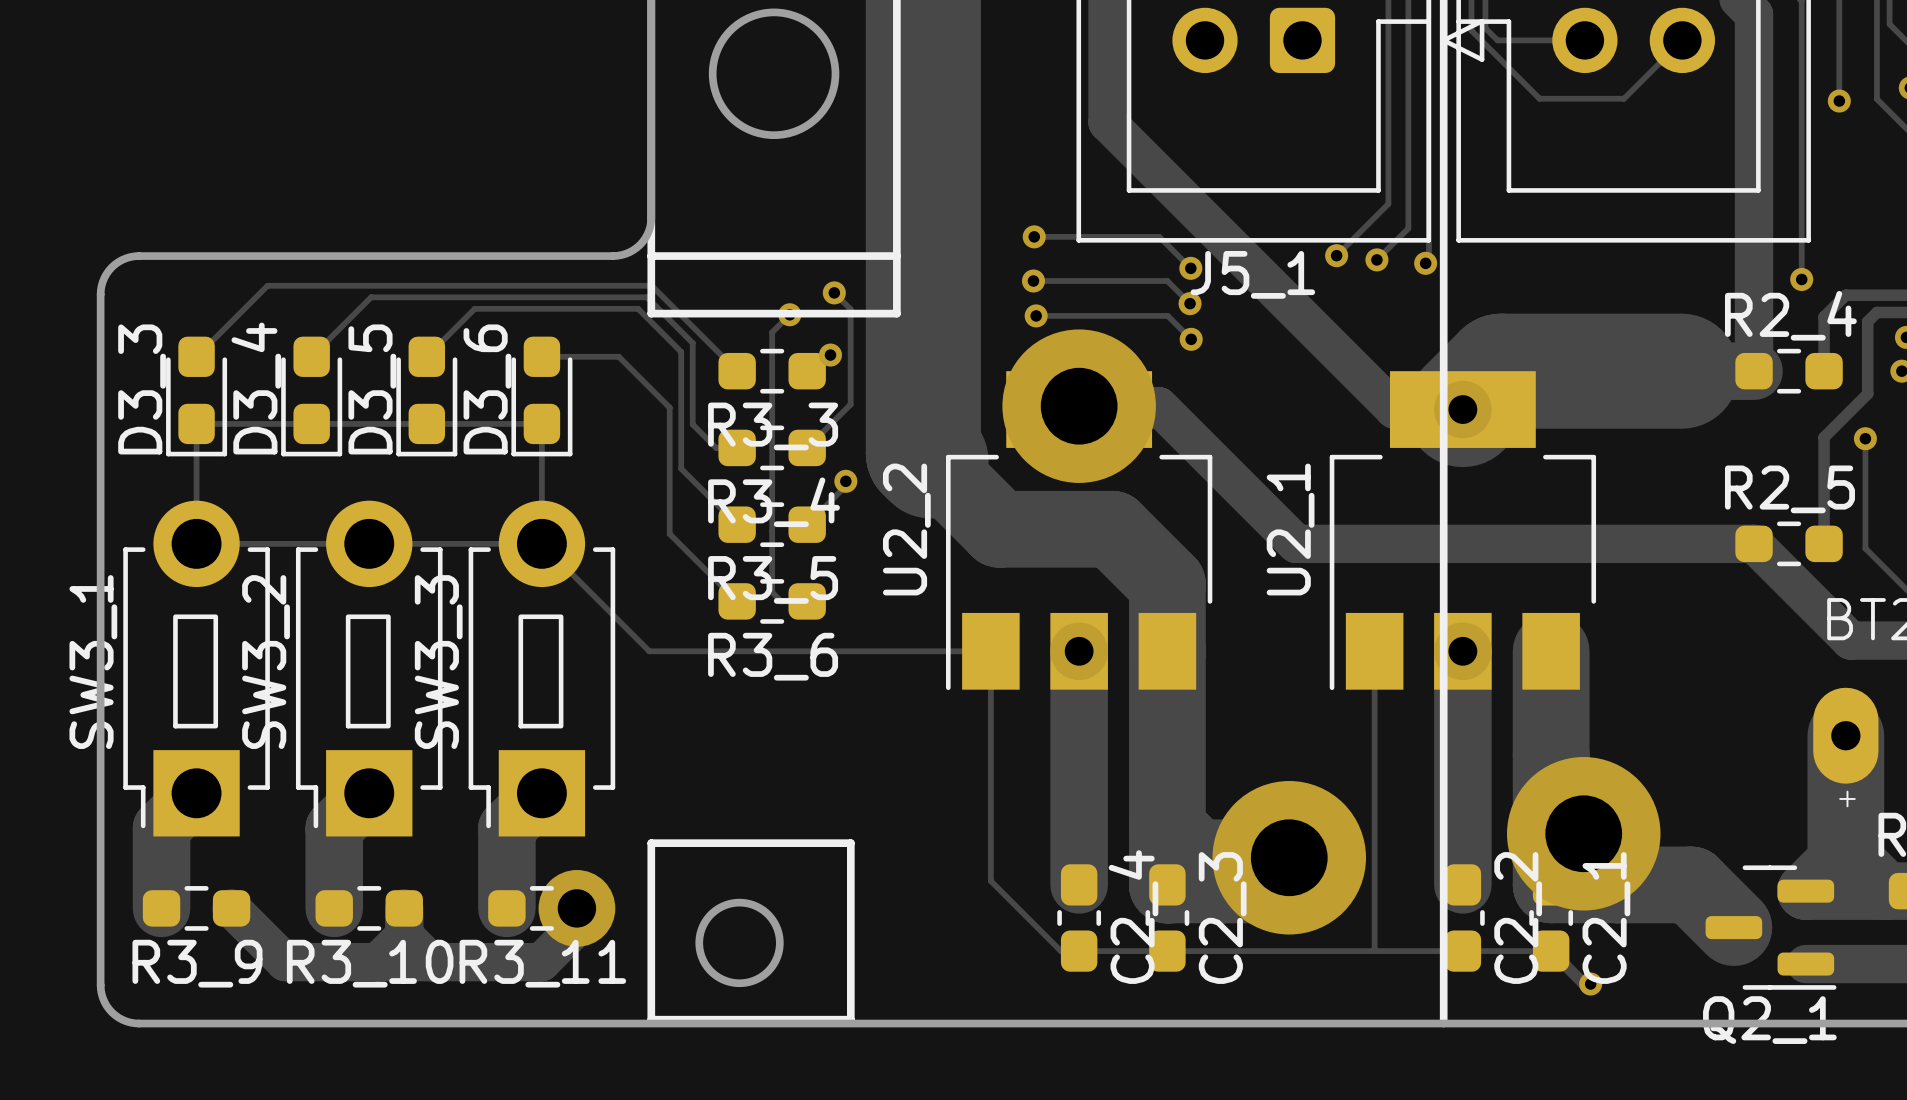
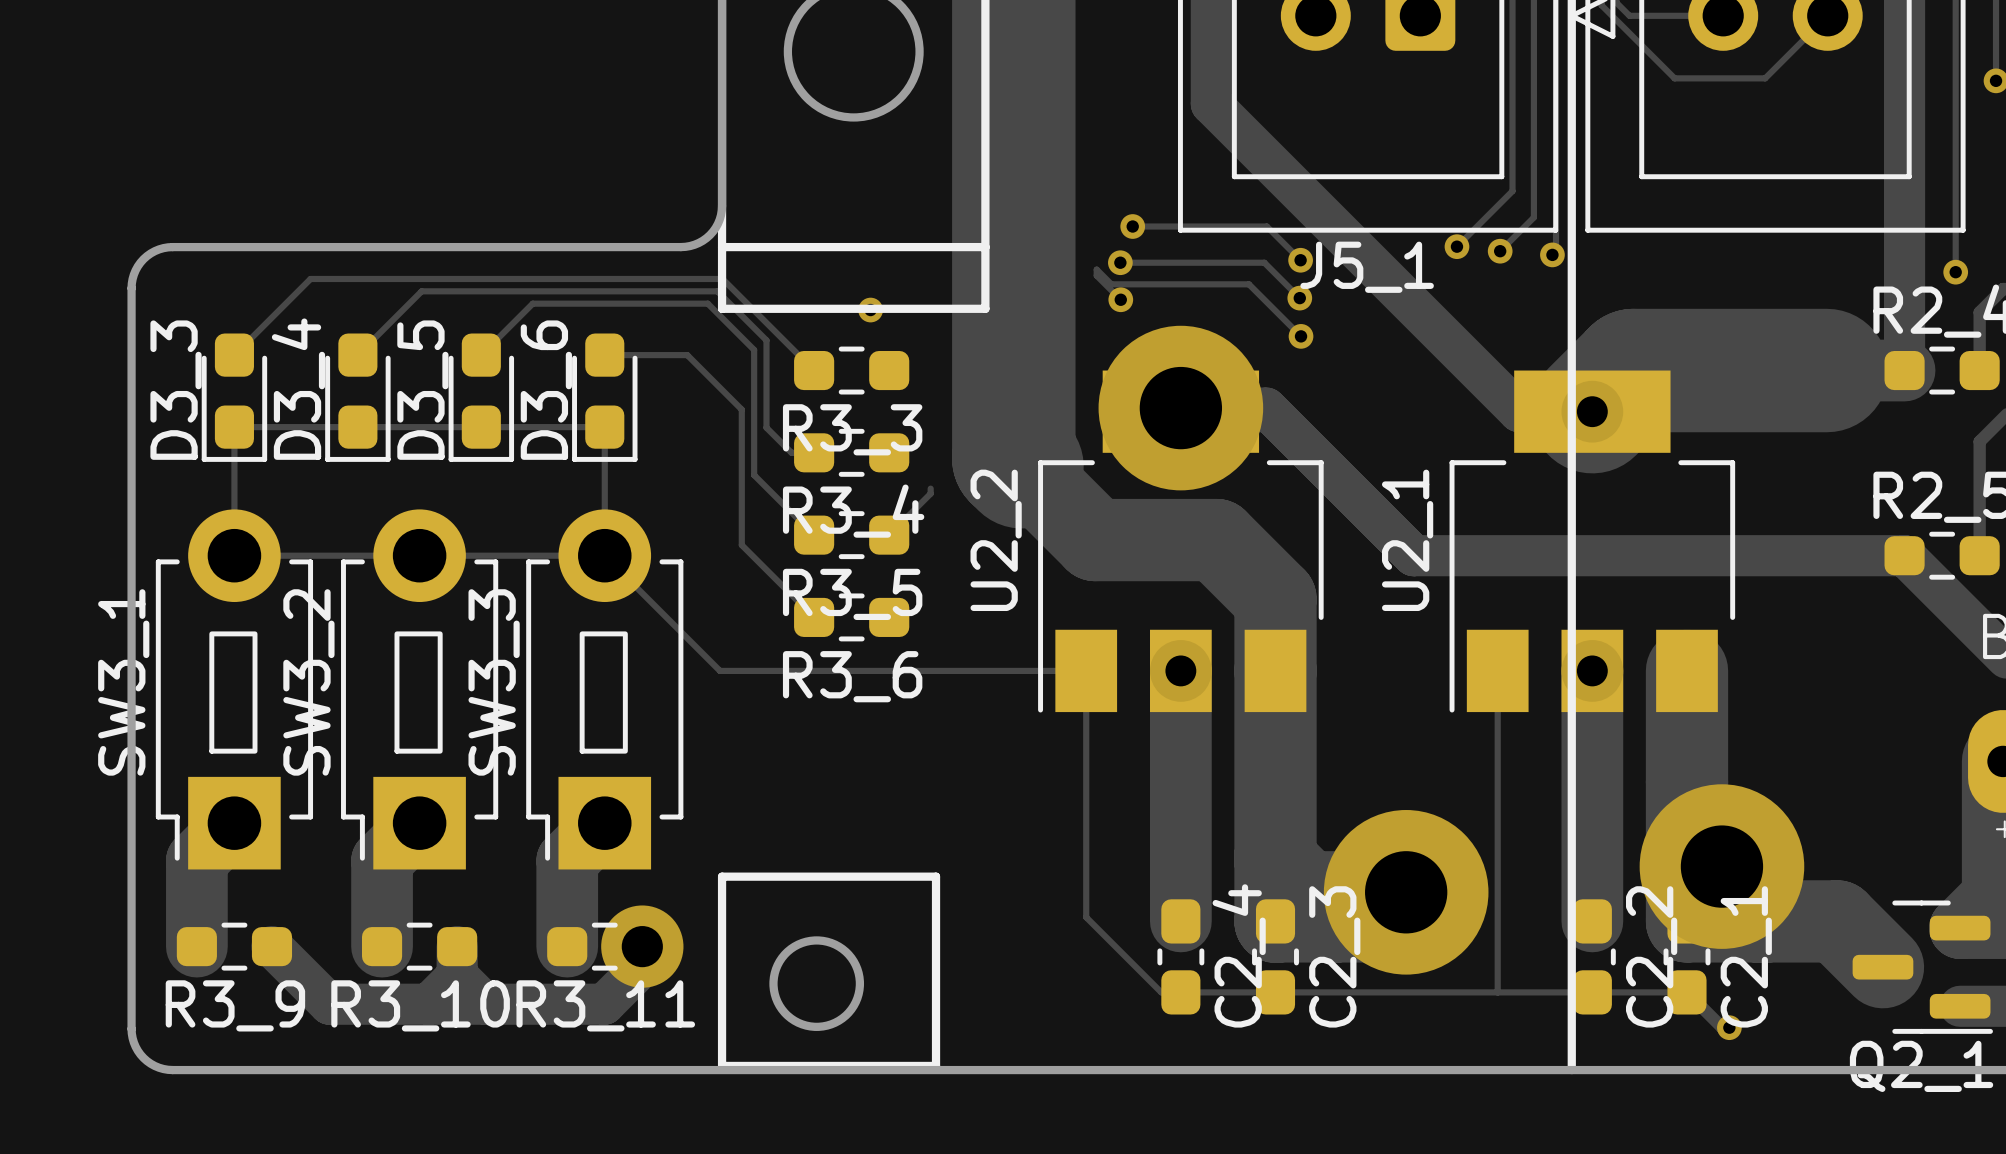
track: (1033, 281) (1167, 281) -> (1120, 262) (1264, 262) (1275, 273)
via position: (1033, 281) -> (1120, 262)
track: (834, 292) (850, 309) (850, 404) (807, 447) -> none
via: (834, 292) -> none
track: (789, 314) (772, 332) (772, 592) (781, 601) (807, 601) -> none
track: (1036, 315) (1167, 315) -> (1120, 299) (1096, 275) (1096, 269) (1111, 284) (1248, 284) (1275, 311)
via position: (1036, 315) -> (1120, 299)
via: (830, 355) -> none
via: (845, 481) -> none

